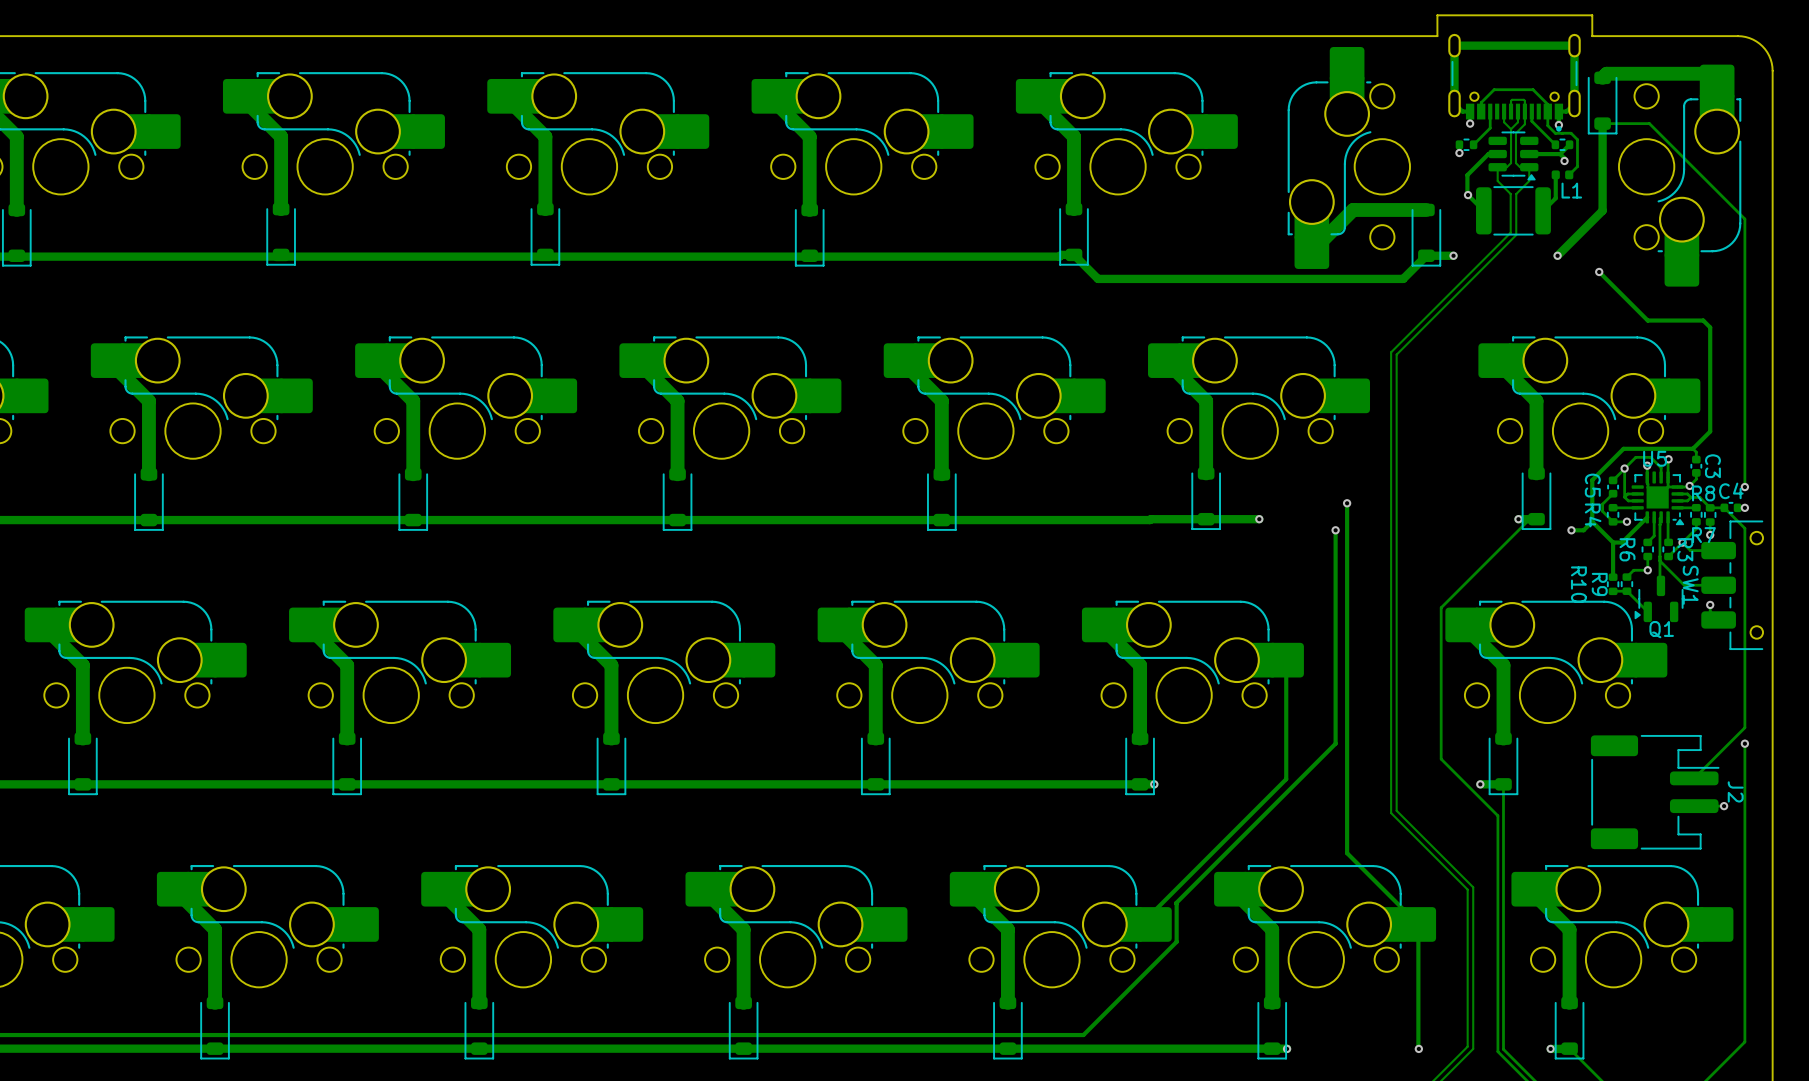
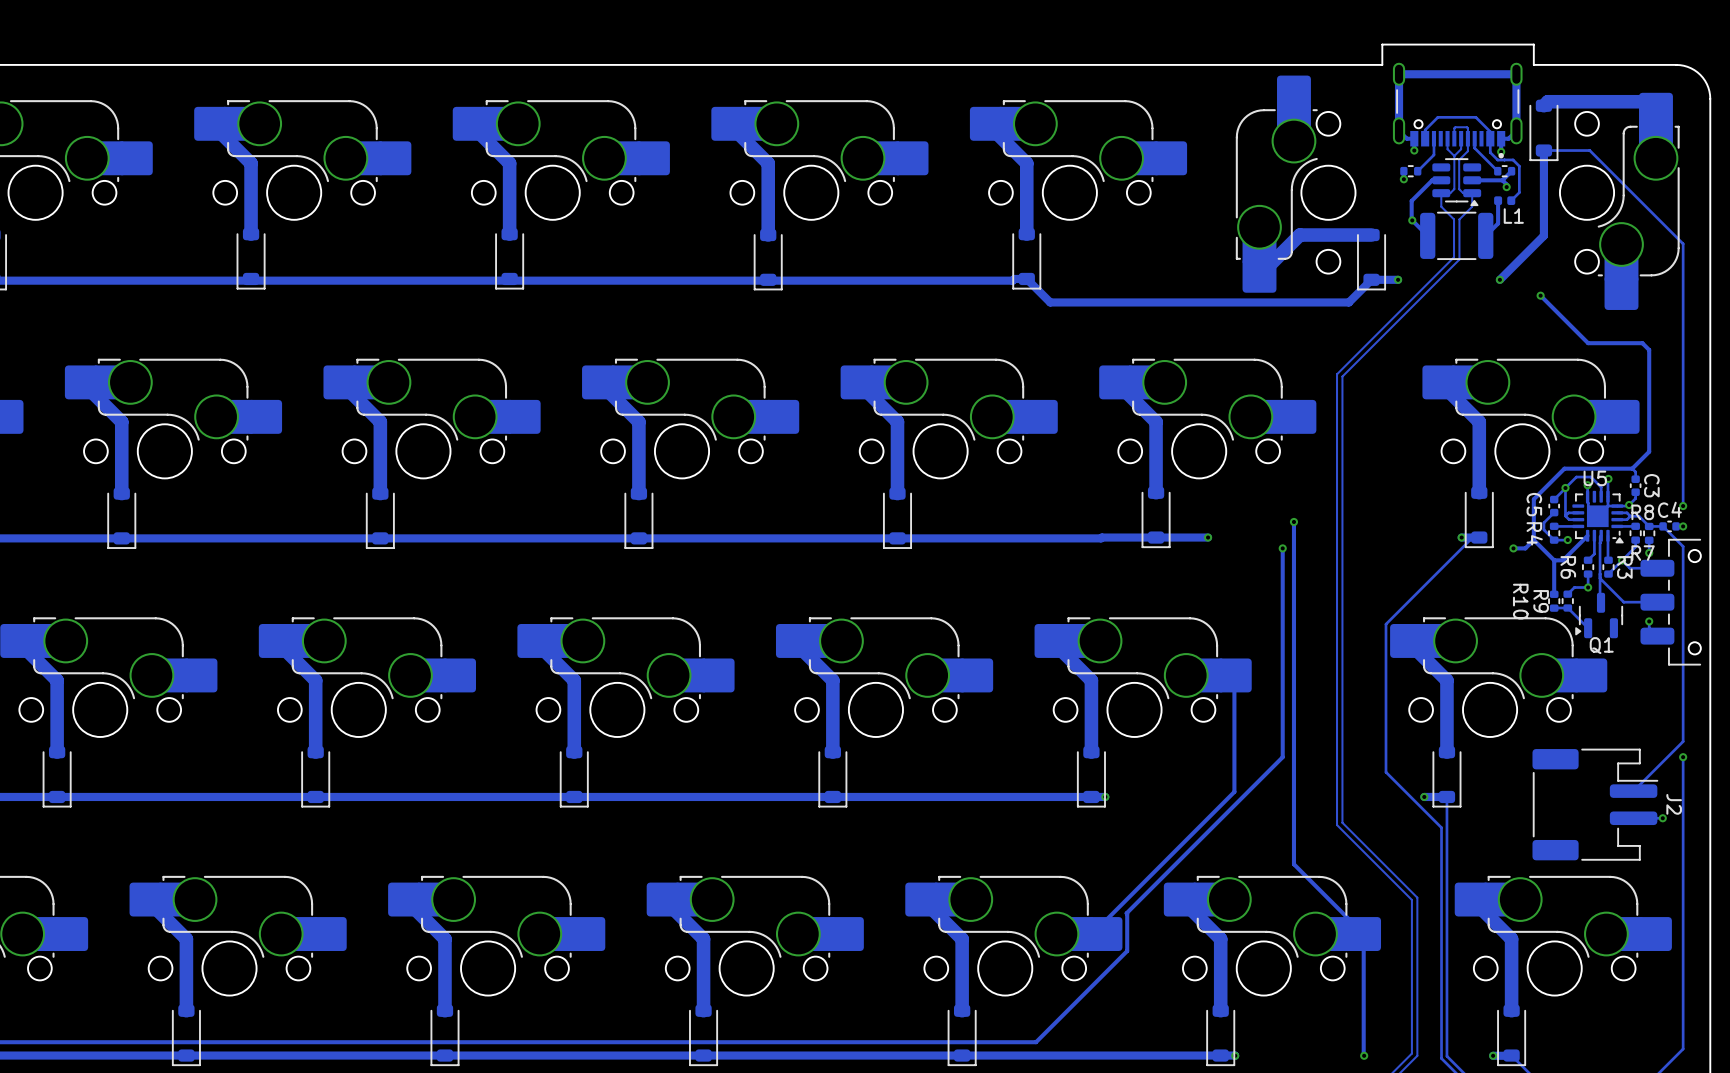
SW1 name: SW1 (1690, 585) -> none

